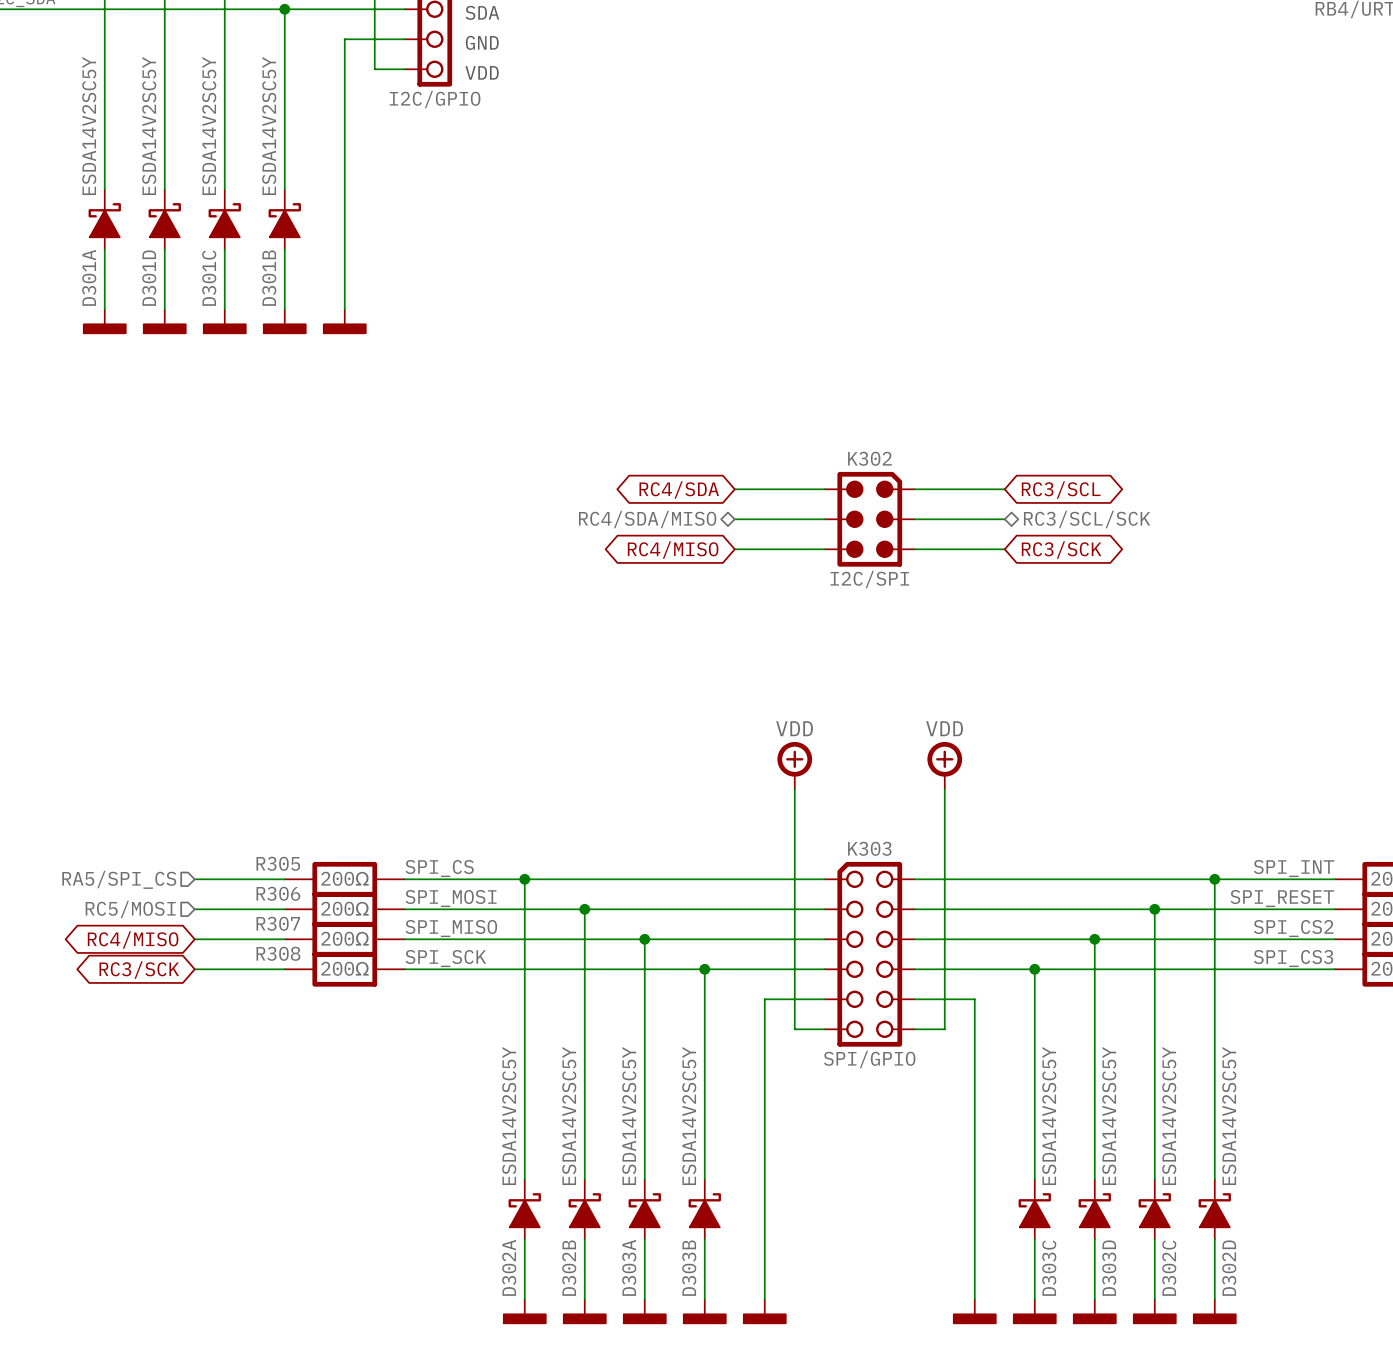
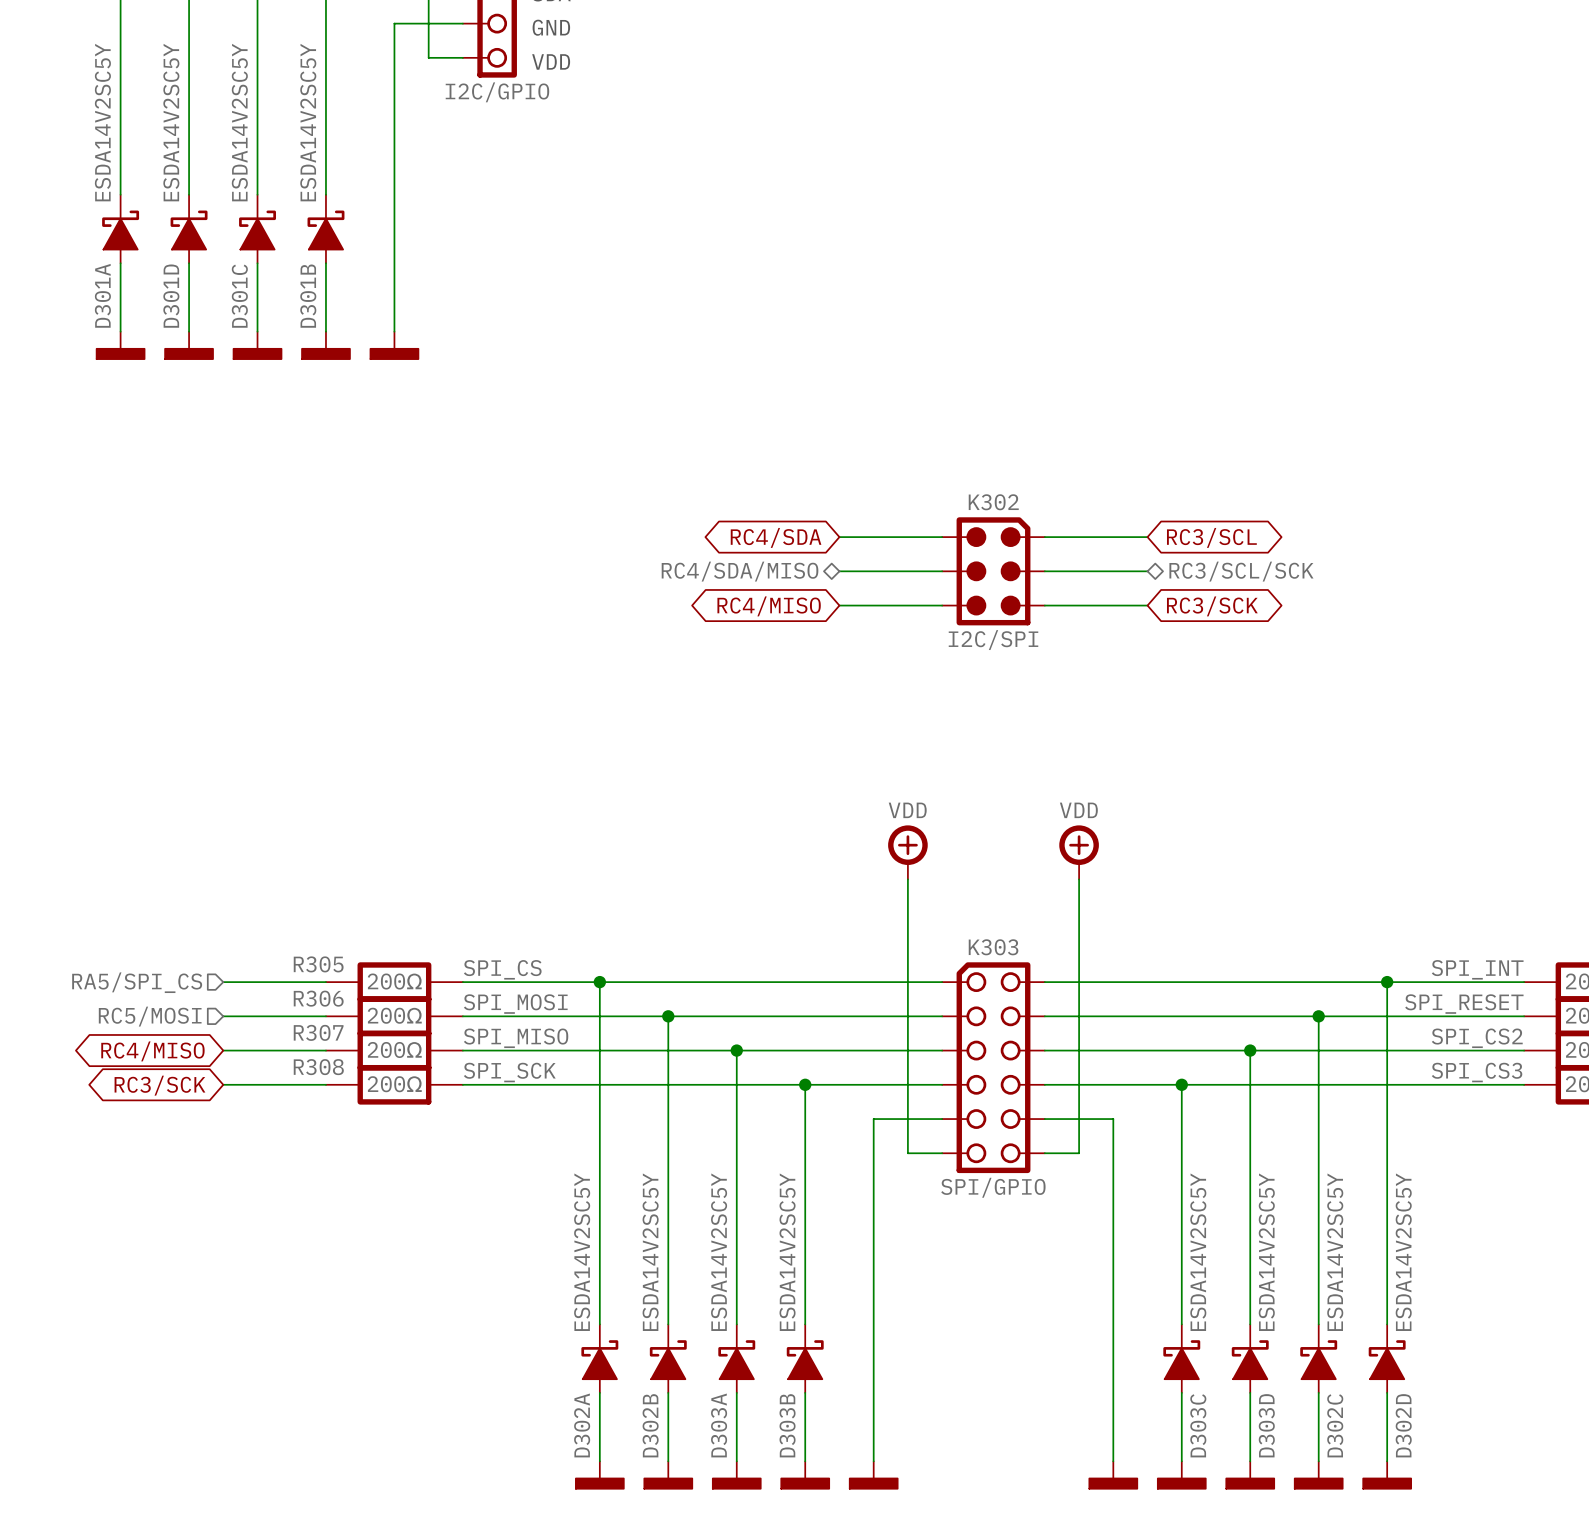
power symbol text: VDD (794, 728) -> none
power symbol text: none -> VDD (907, 810)
power symbol text: VDD (944, 728) -> none
power symbol text: none -> VDD (1078, 810)

